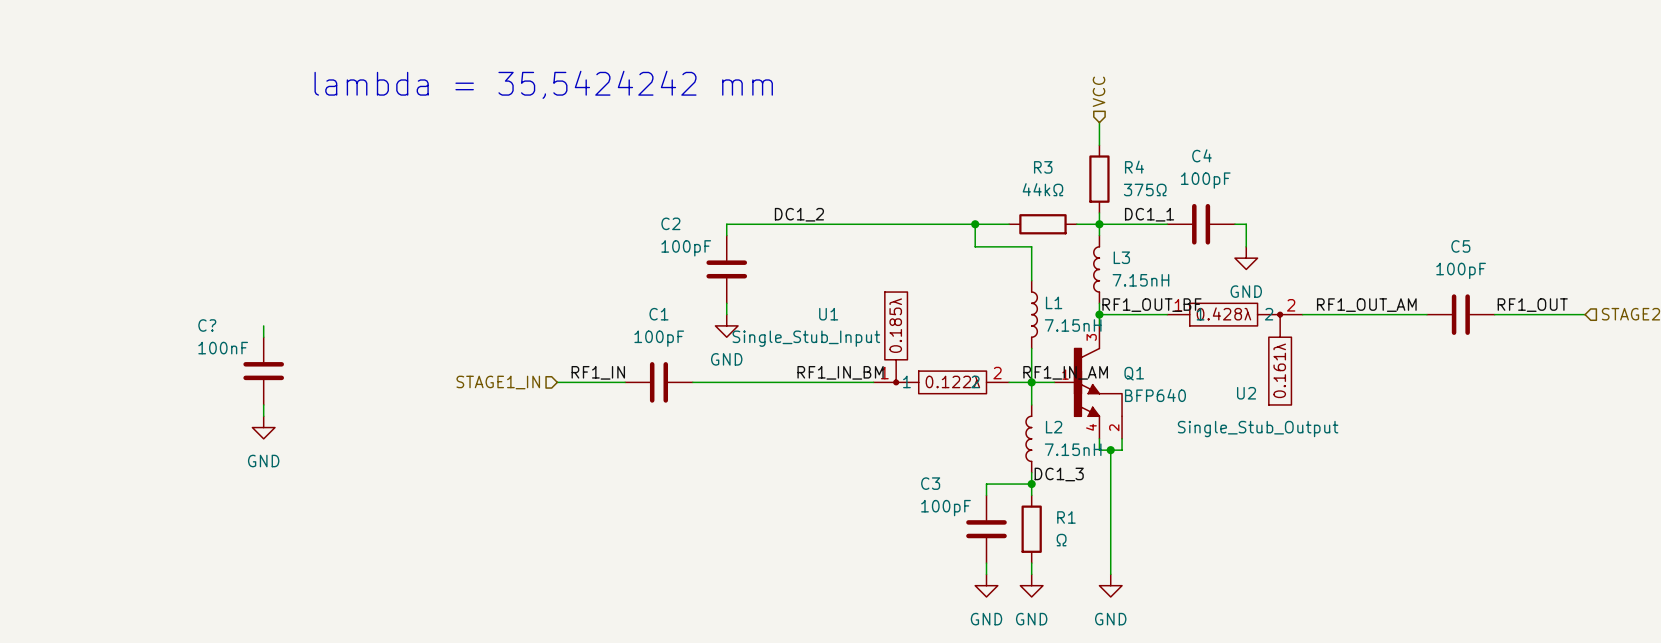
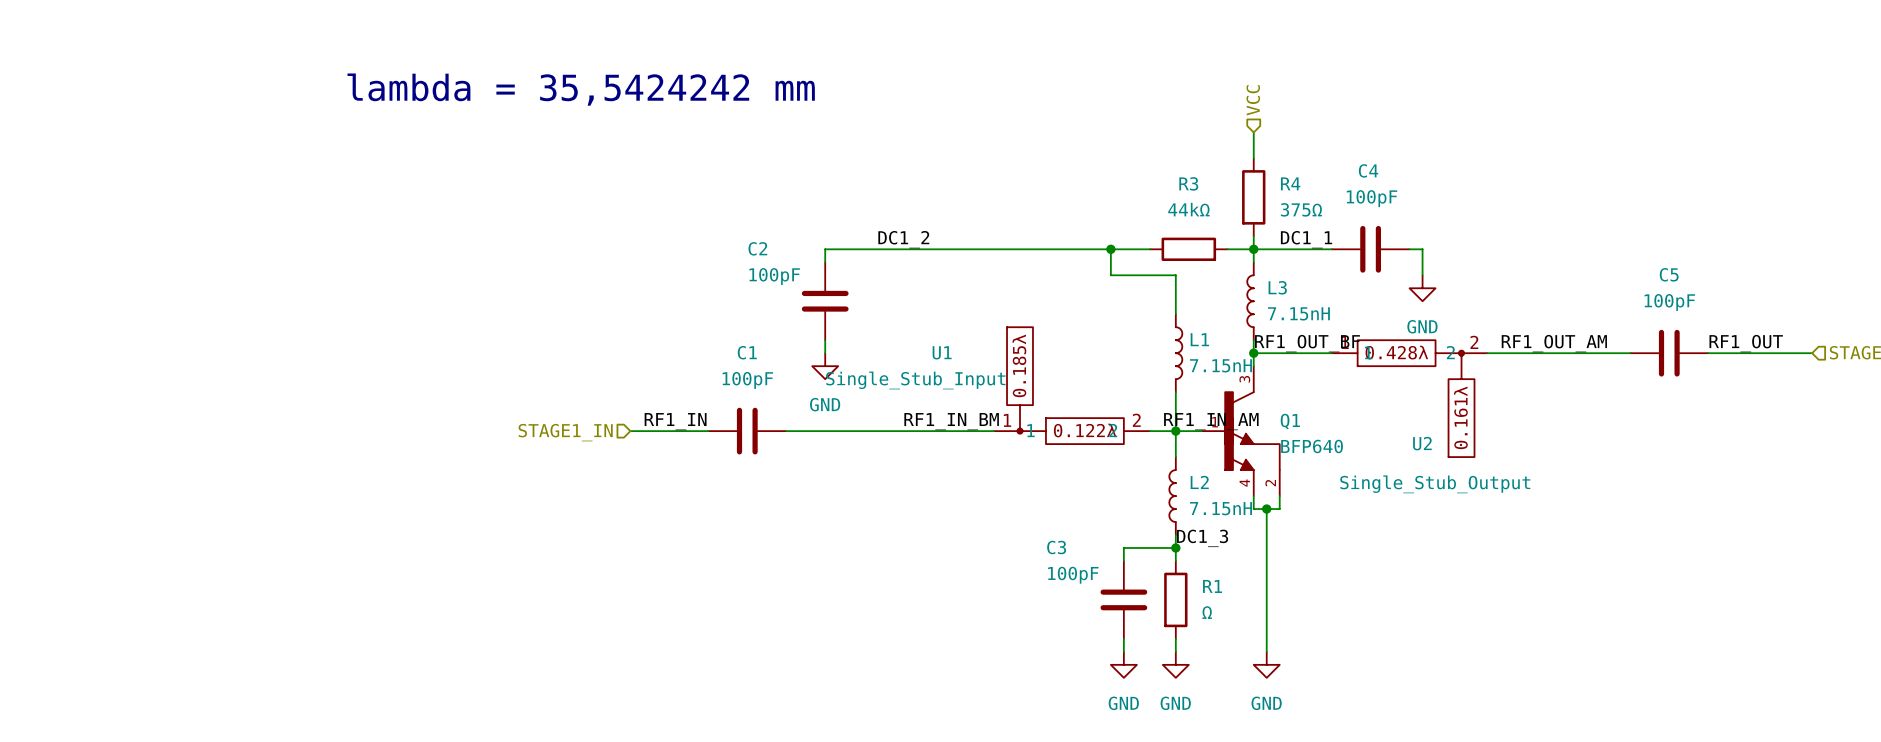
wire: (263, 325) (263, 337) -> none
C?: 100nF (263, 371) -> none
wire: (263, 404) (263, 416) -> none
power symbol: GND (263, 427) -> none

